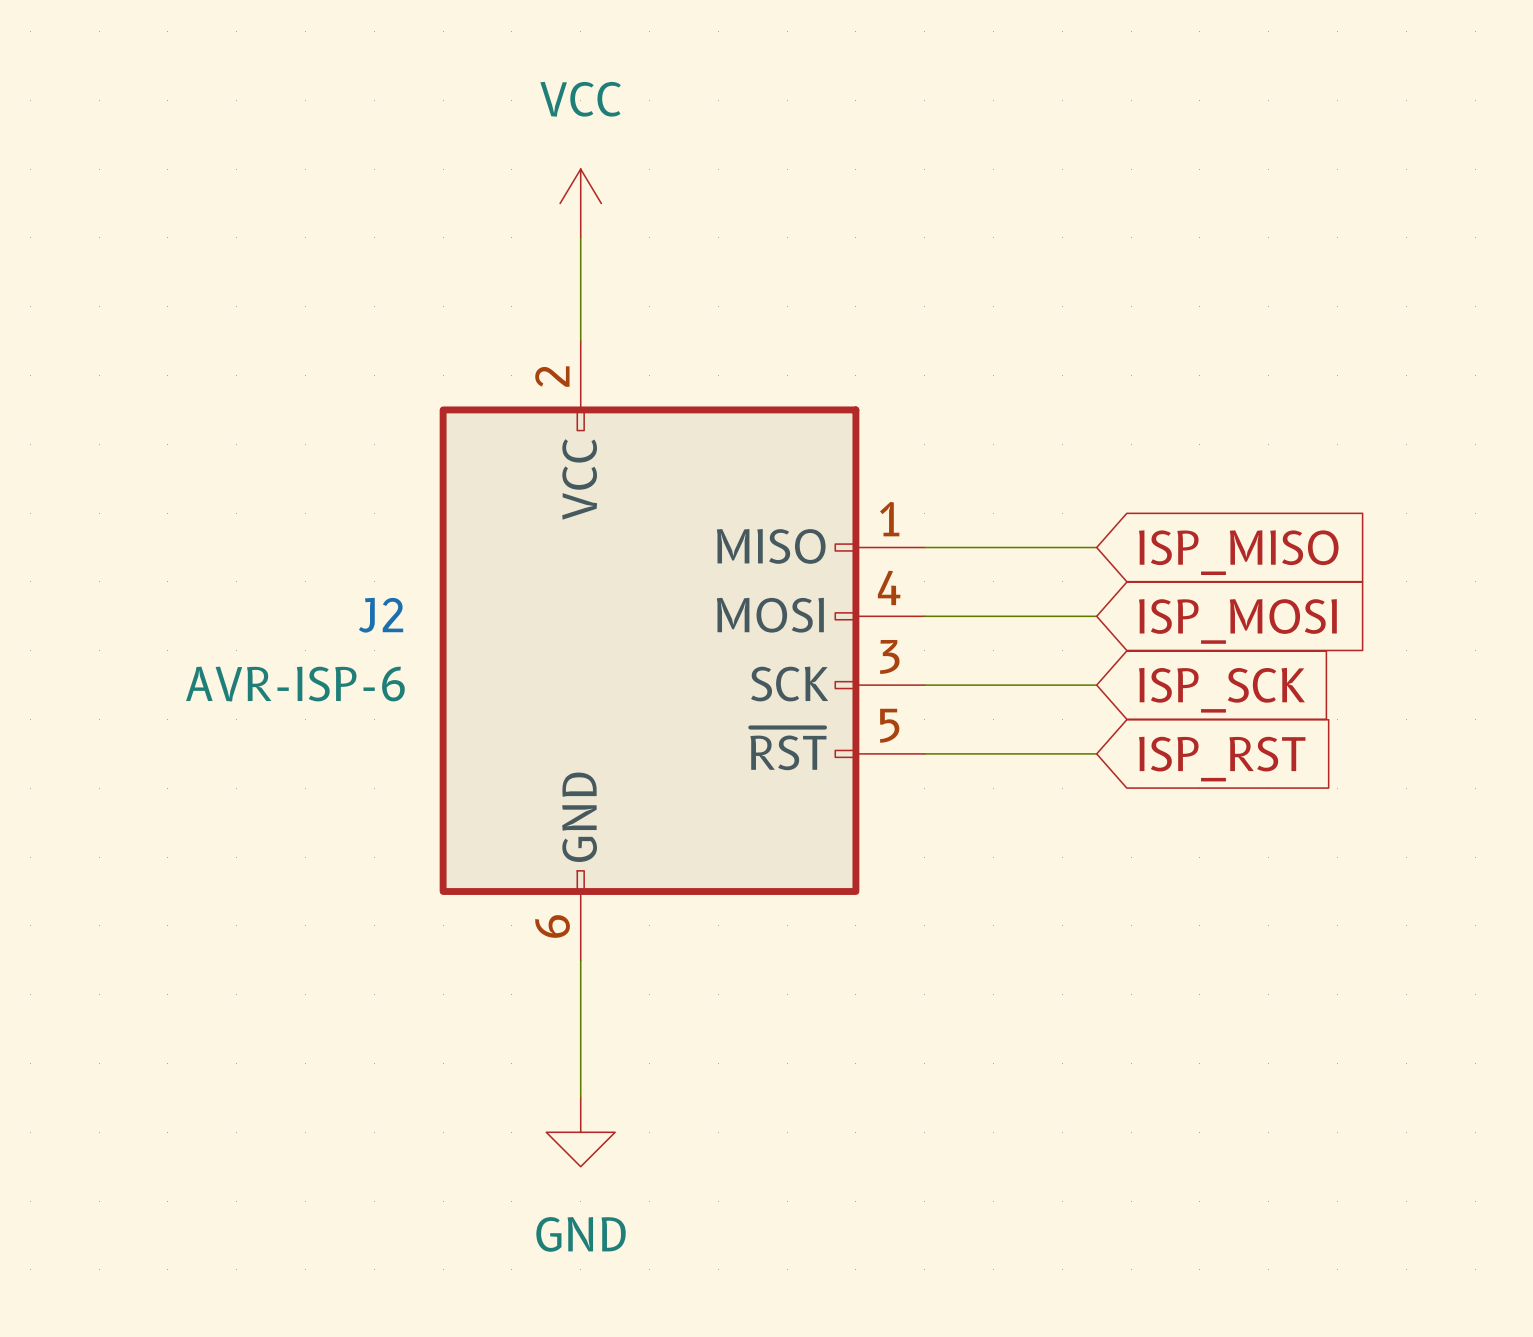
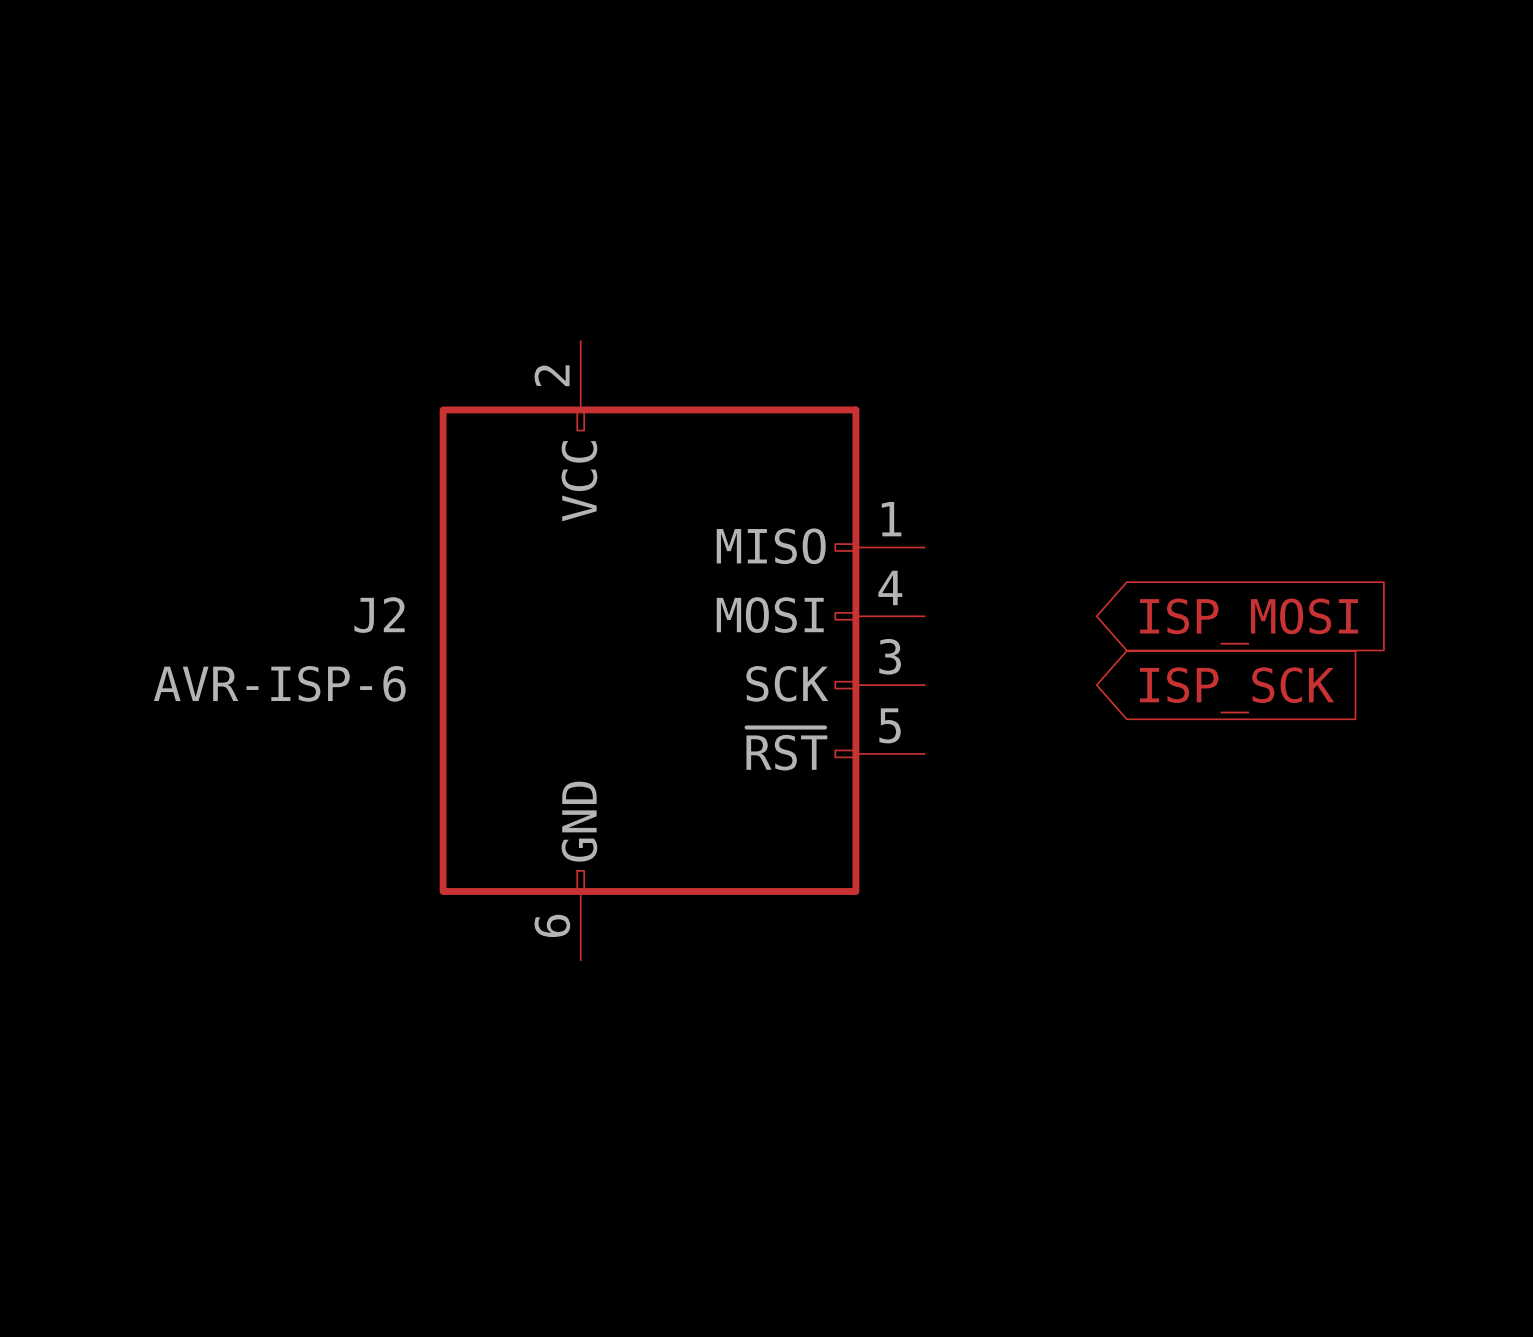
power symbol: VCC (580, 203) -> none
wire: (580, 237) (580, 341) -> none
wire: (924, 547) (1096, 547) -> none
global label: ISP_MISO (1238, 552) -> none
wire: (924, 616) (1096, 616) -> none
wire: (924, 685) (1096, 685) -> none
wire: (924, 753) (1096, 753) -> none
global label: ISP_RST (1222, 759) -> none
wire: (580, 960) (580, 1097) -> none
power symbol: GND (580, 1132) -> none

